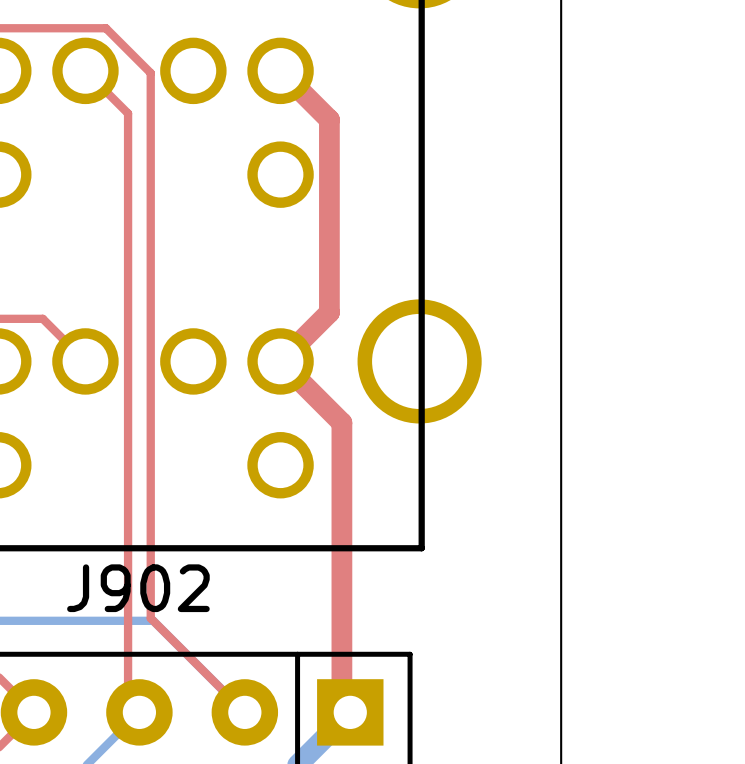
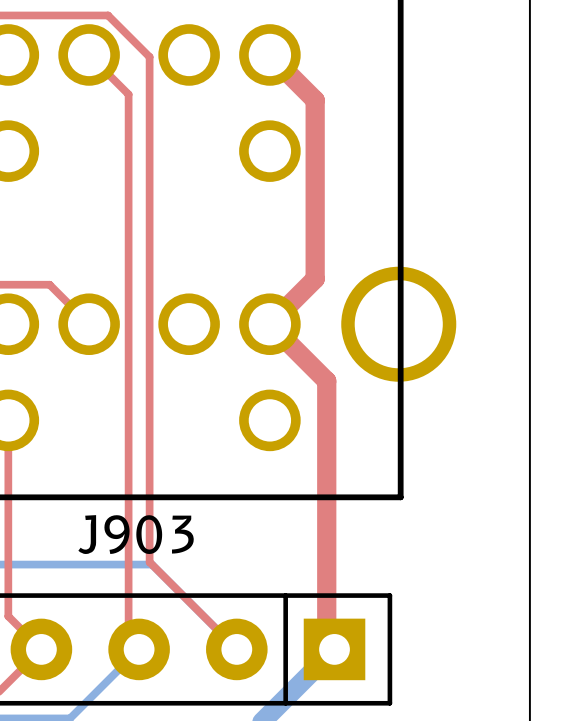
J902 name: J902 (138, 588) -> J903 (136, 534)

